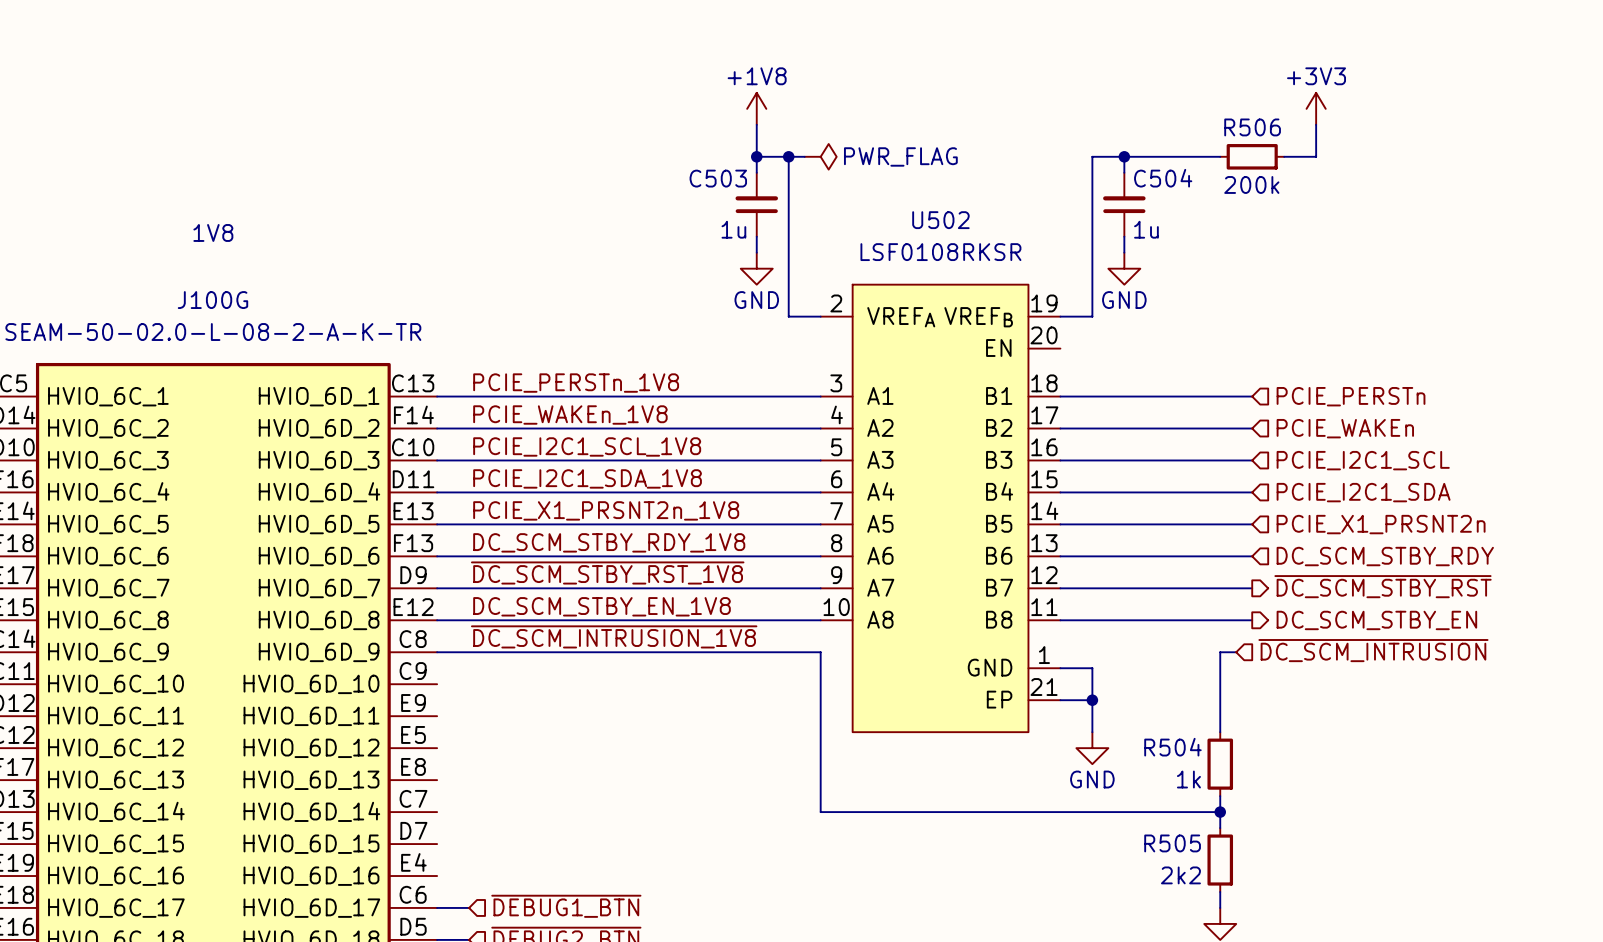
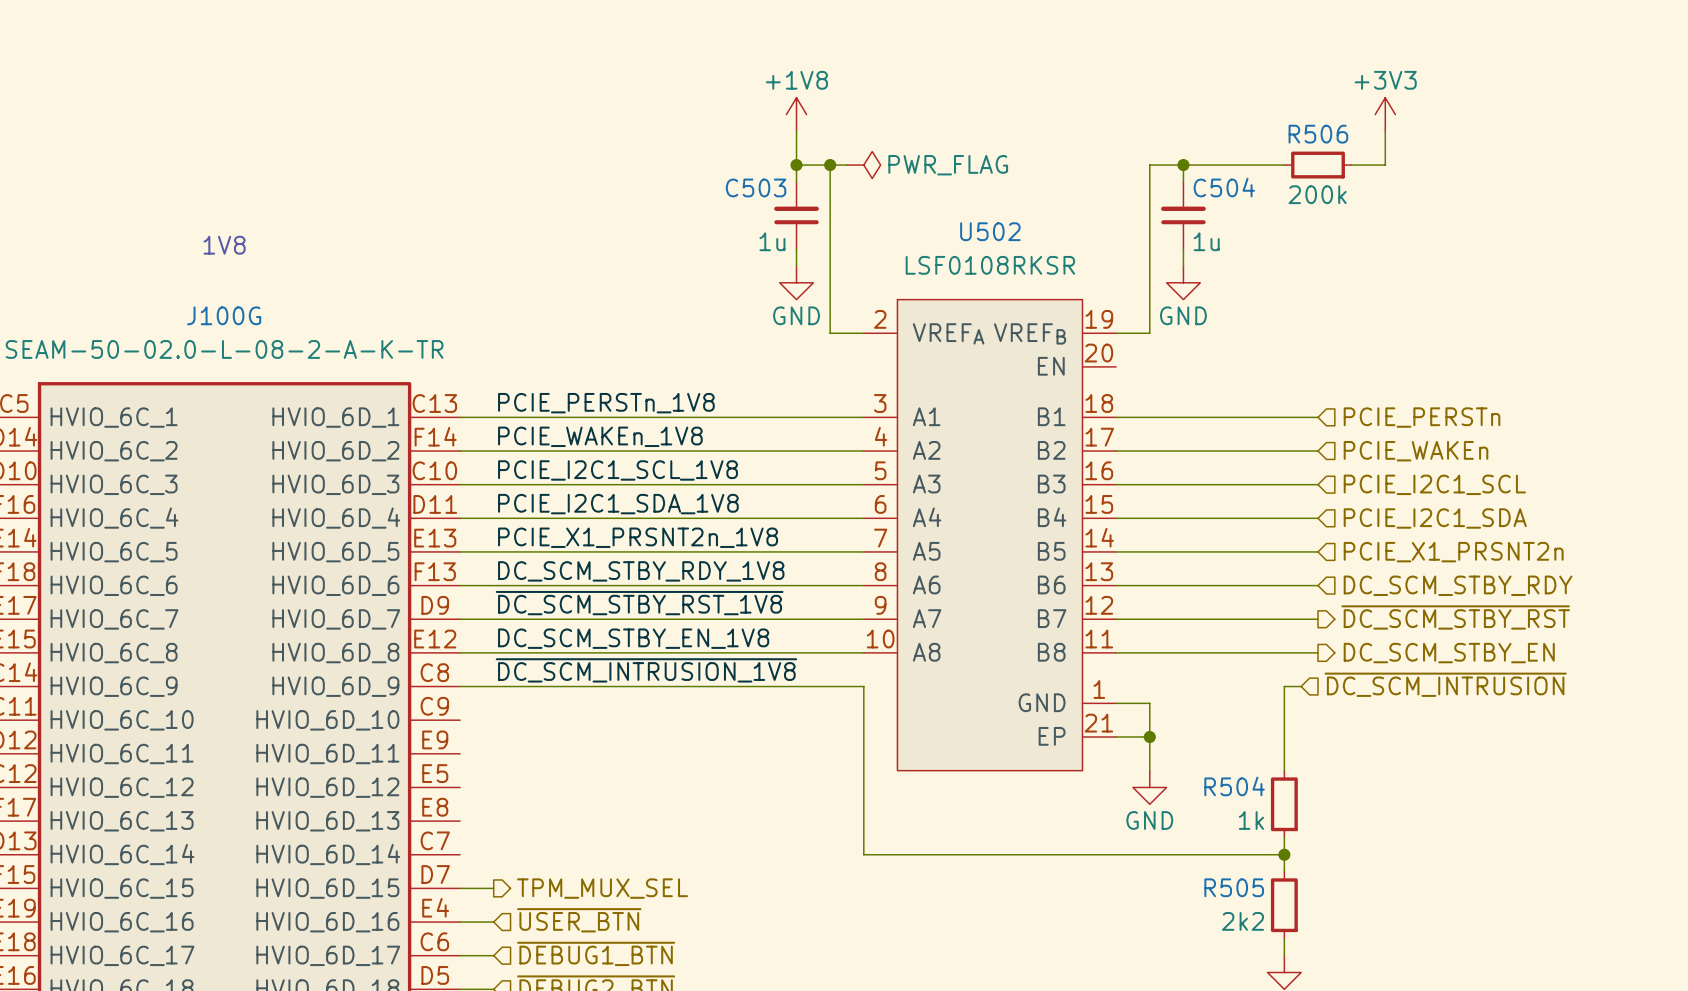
wire: none -> (460, 888) (493, 888)
hierarchical label: none -> TPM_MUX_SEL (602, 888)
hierarchical label: none -> ~{USER_BTN} (579, 920)
wire: none -> (460, 922) (493, 922)

